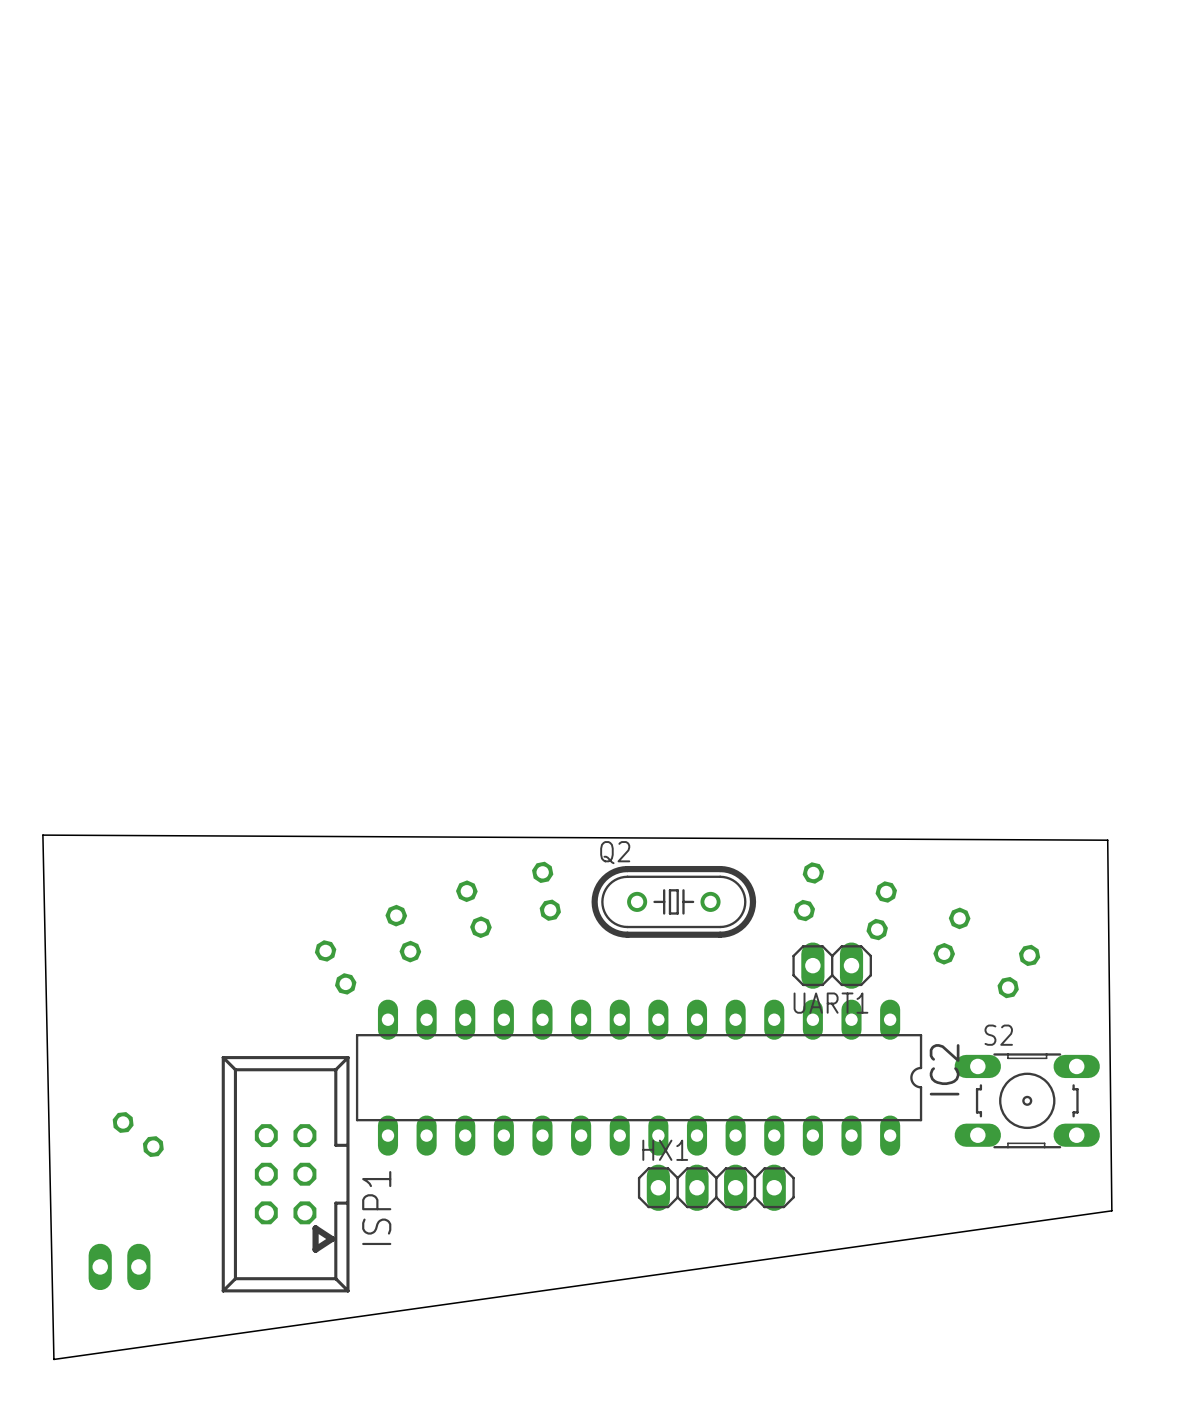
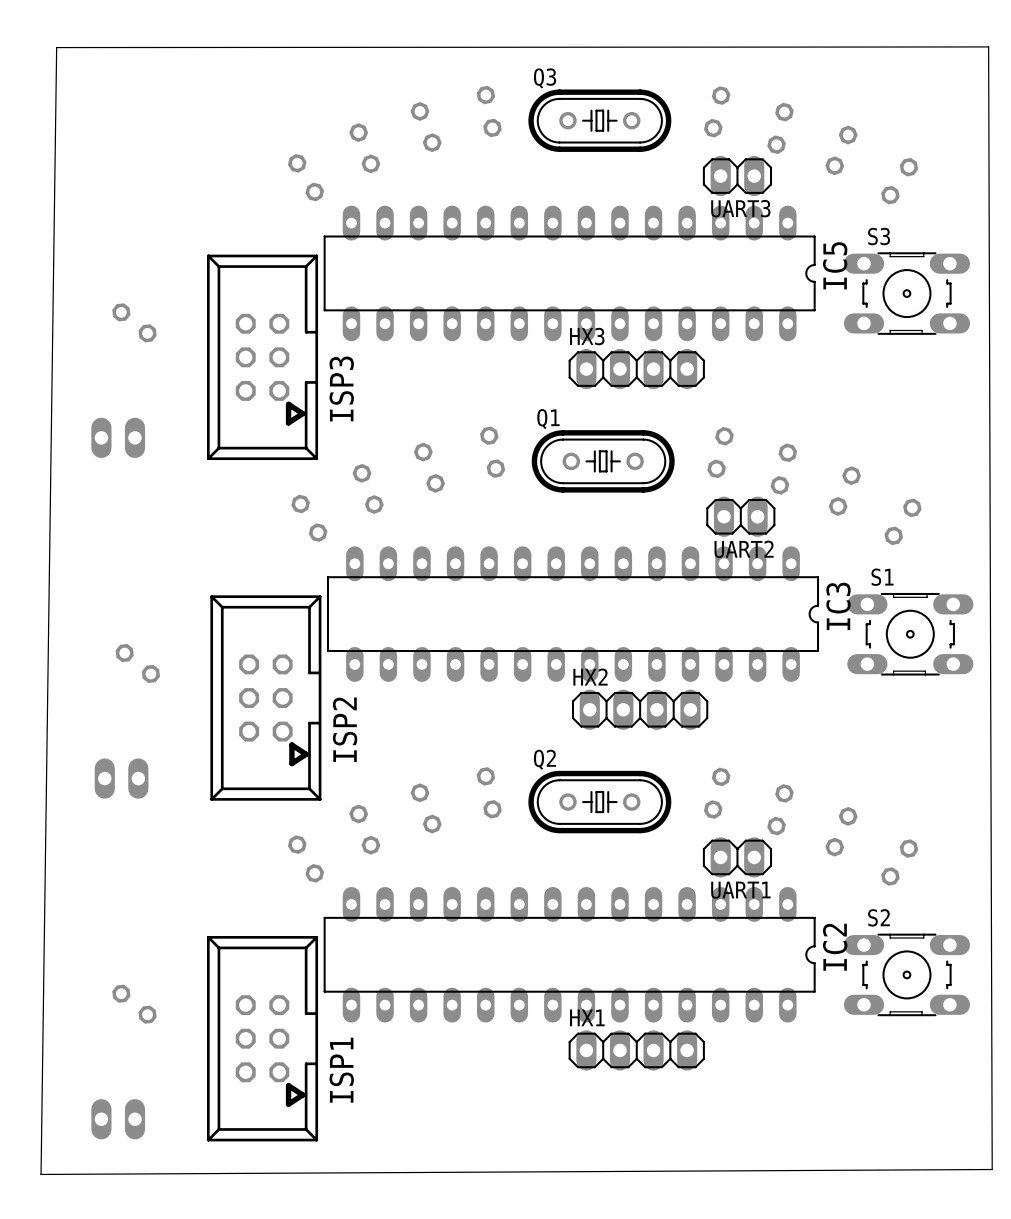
board edge: none -> (988, 46) (992, 1169) (41, 1174) (56, 47) (988, 46)
part: none -> (489, 111)
part: none -> (717, 111)
Q3: none -> (599, 120)
part: none -> (426, 127)
part: none -> (780, 128)
part: none -> (364, 148)
part: none -> (841, 150)
UART3: none -> (737, 176)
part: none -> (306, 177)
part: none -> (899, 181)
IC5: none -> (569, 273)
S3: none -> (906, 293)
part: none -> (134, 322)
ISP3: none -> (262, 357)
HX3: none -> (636, 369)
part: none -> (118, 437)
part: none -> (492, 452)
part: none -> (720, 452)
Q1: none -> (603, 461)
part: none -> (429, 467)
part: none -> (783, 469)
part: none -> (368, 488)
part: none -> (844, 491)
UART2: none -> (740, 516)
part: none -> (309, 518)
part: none -> (903, 521)
IC3: none -> (573, 614)
S1: none -> (910, 634)
part: none -> (137, 663)
ISP2: none -> (265, 698)
HX2: none -> (640, 709)
board edge: (42, 835) (1107, 840) (1111, 1210) (53, 1359) (42, 835) -> none
part: none -> (121, 778)

